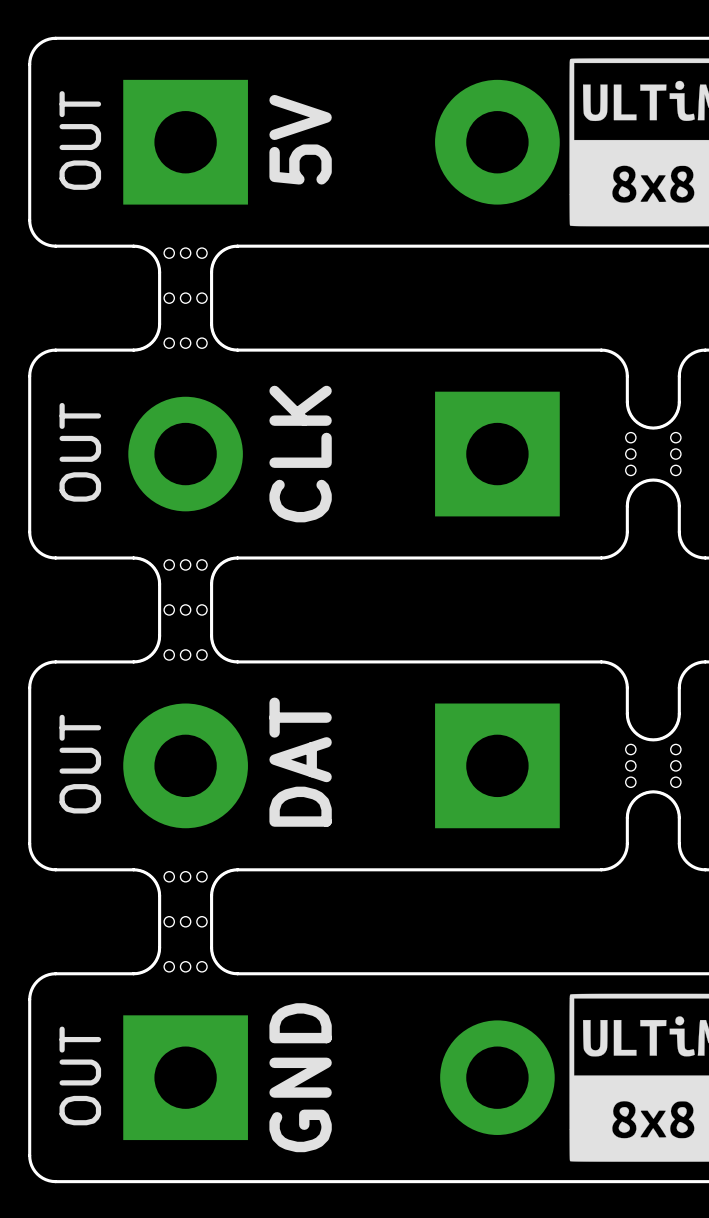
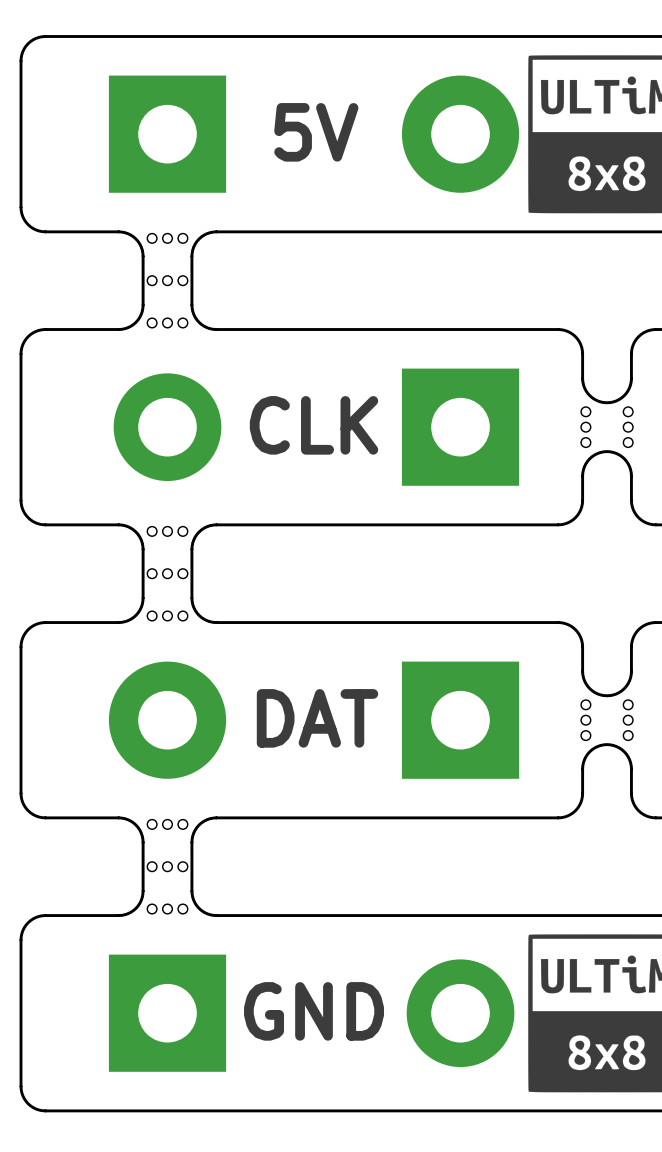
text rotation: 0° (300, 139) -> 90° clockwise (316, 132)
text: OUT (80, 140) -> none
text: OUT (80, 452) -> none
text rotation: 0° (300, 454) -> 90° clockwise (314, 425)
text rotation: 0° (300, 762) -> 90° clockwise (317, 718)
text: OUT (80, 764) -> none
text: OUT (80, 1075) -> none
text rotation: 0° (300, 1077) -> 90° clockwise (314, 1011)

